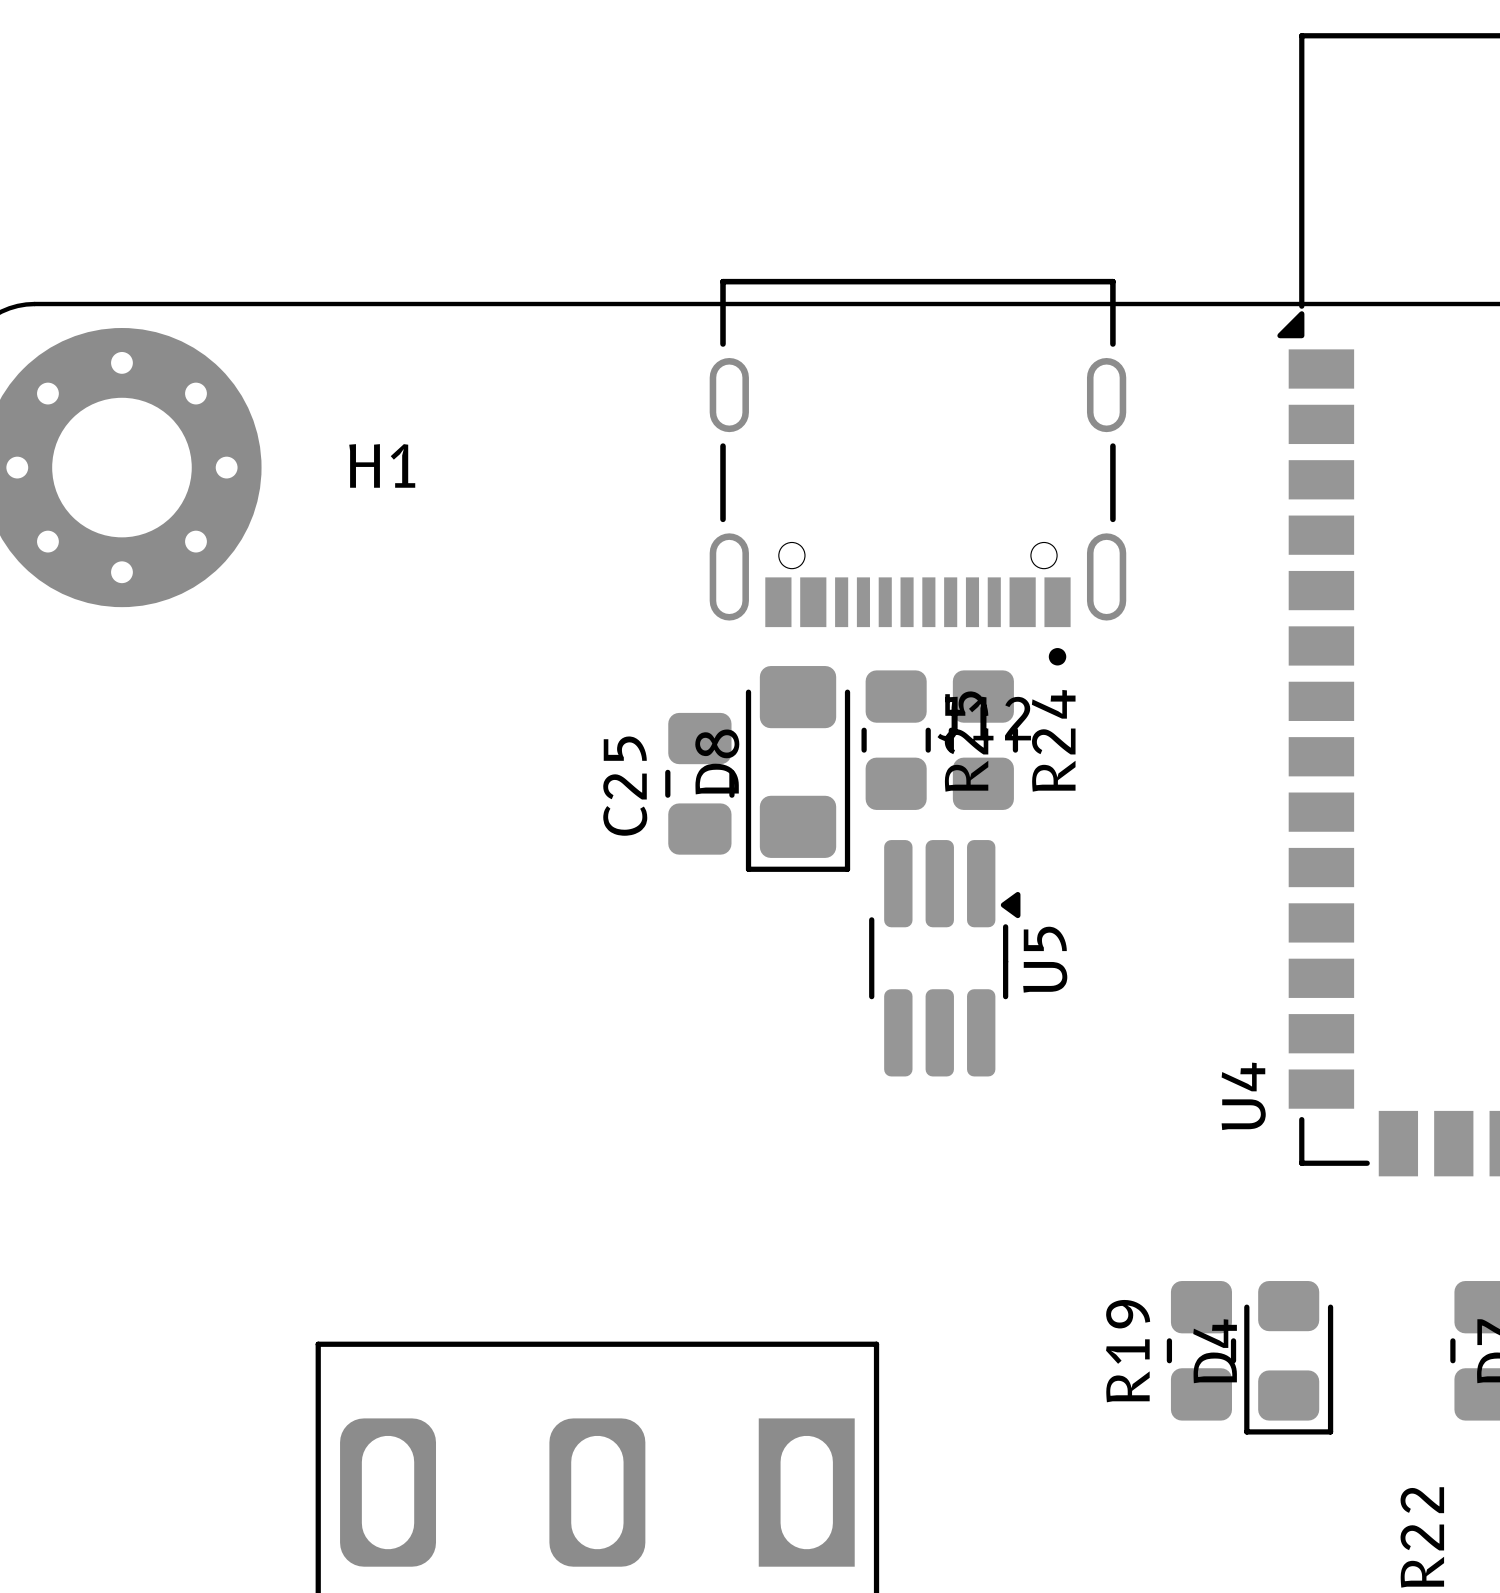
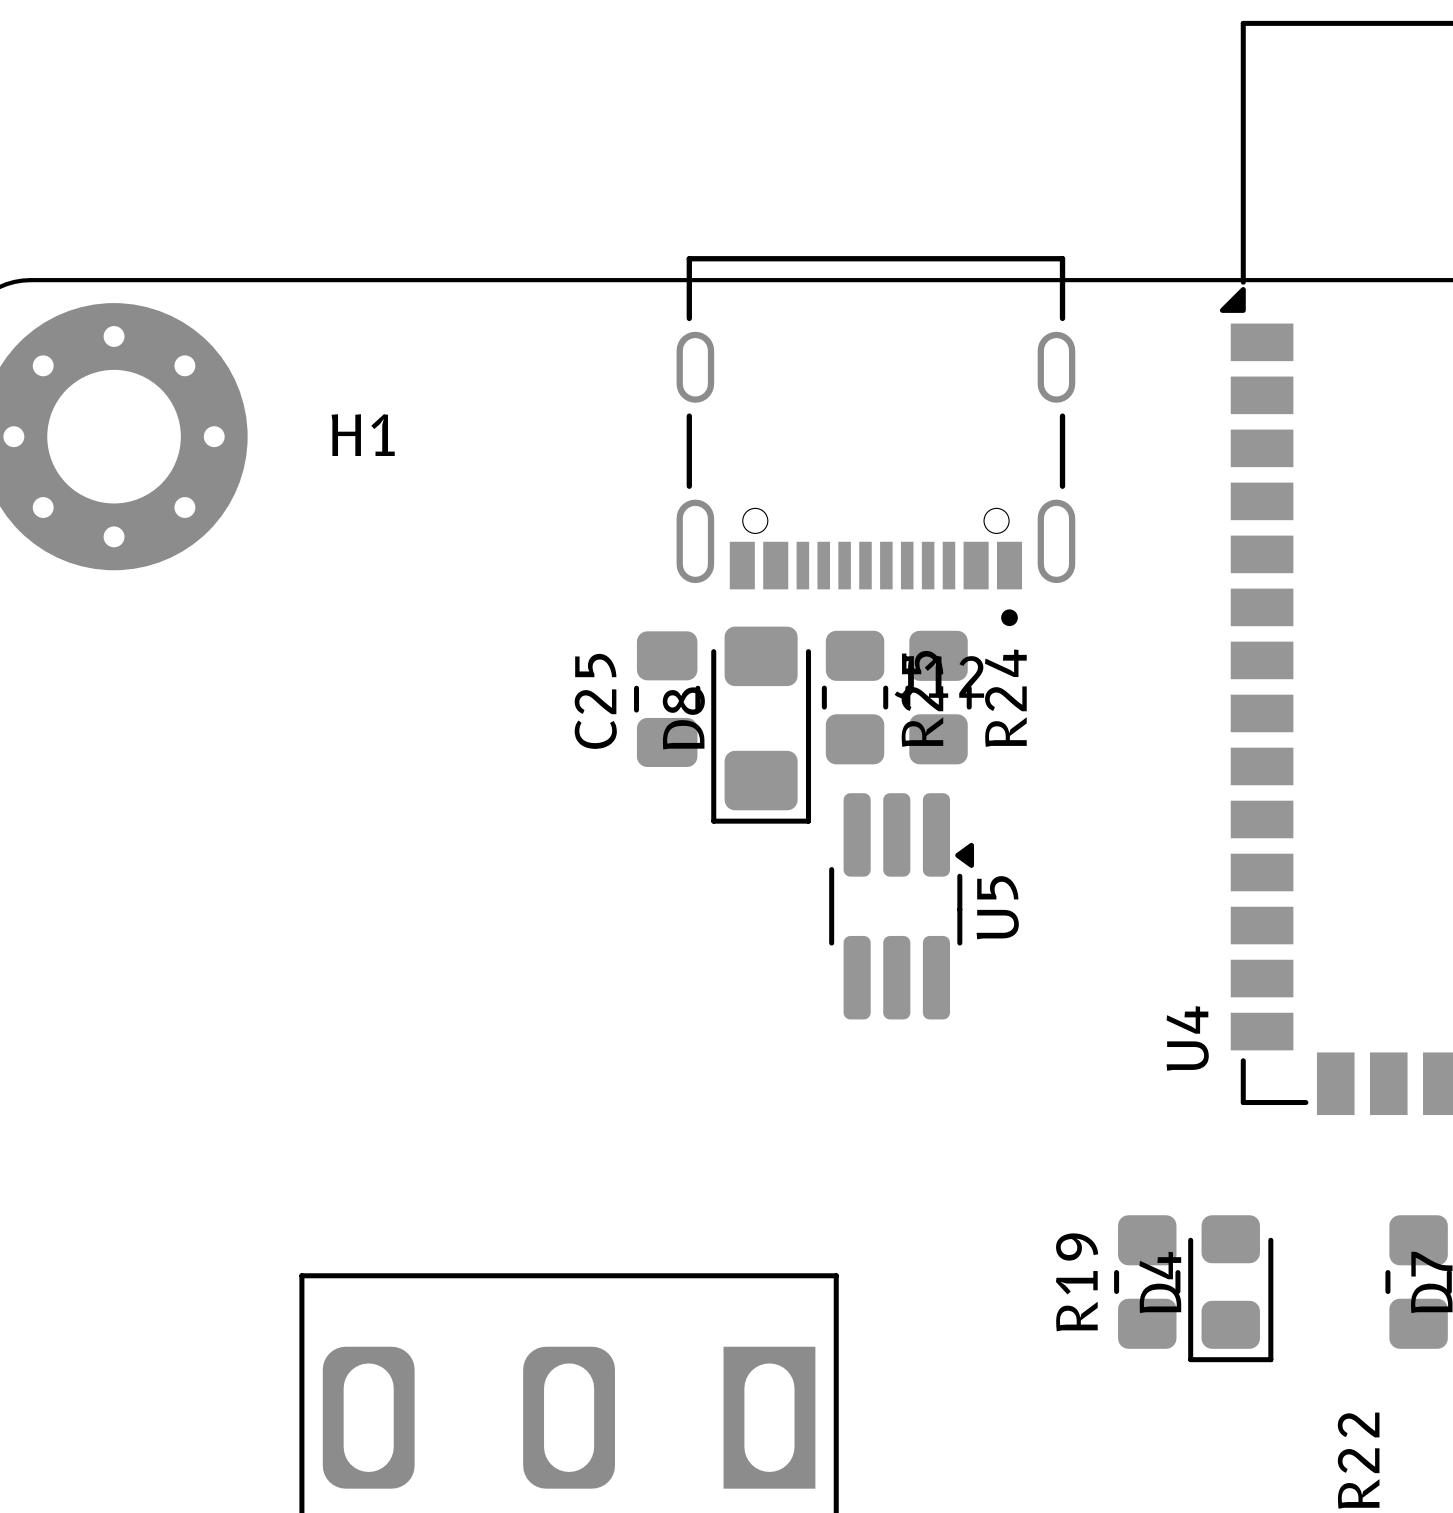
C25 position: (699, 783) -> (667, 699)

